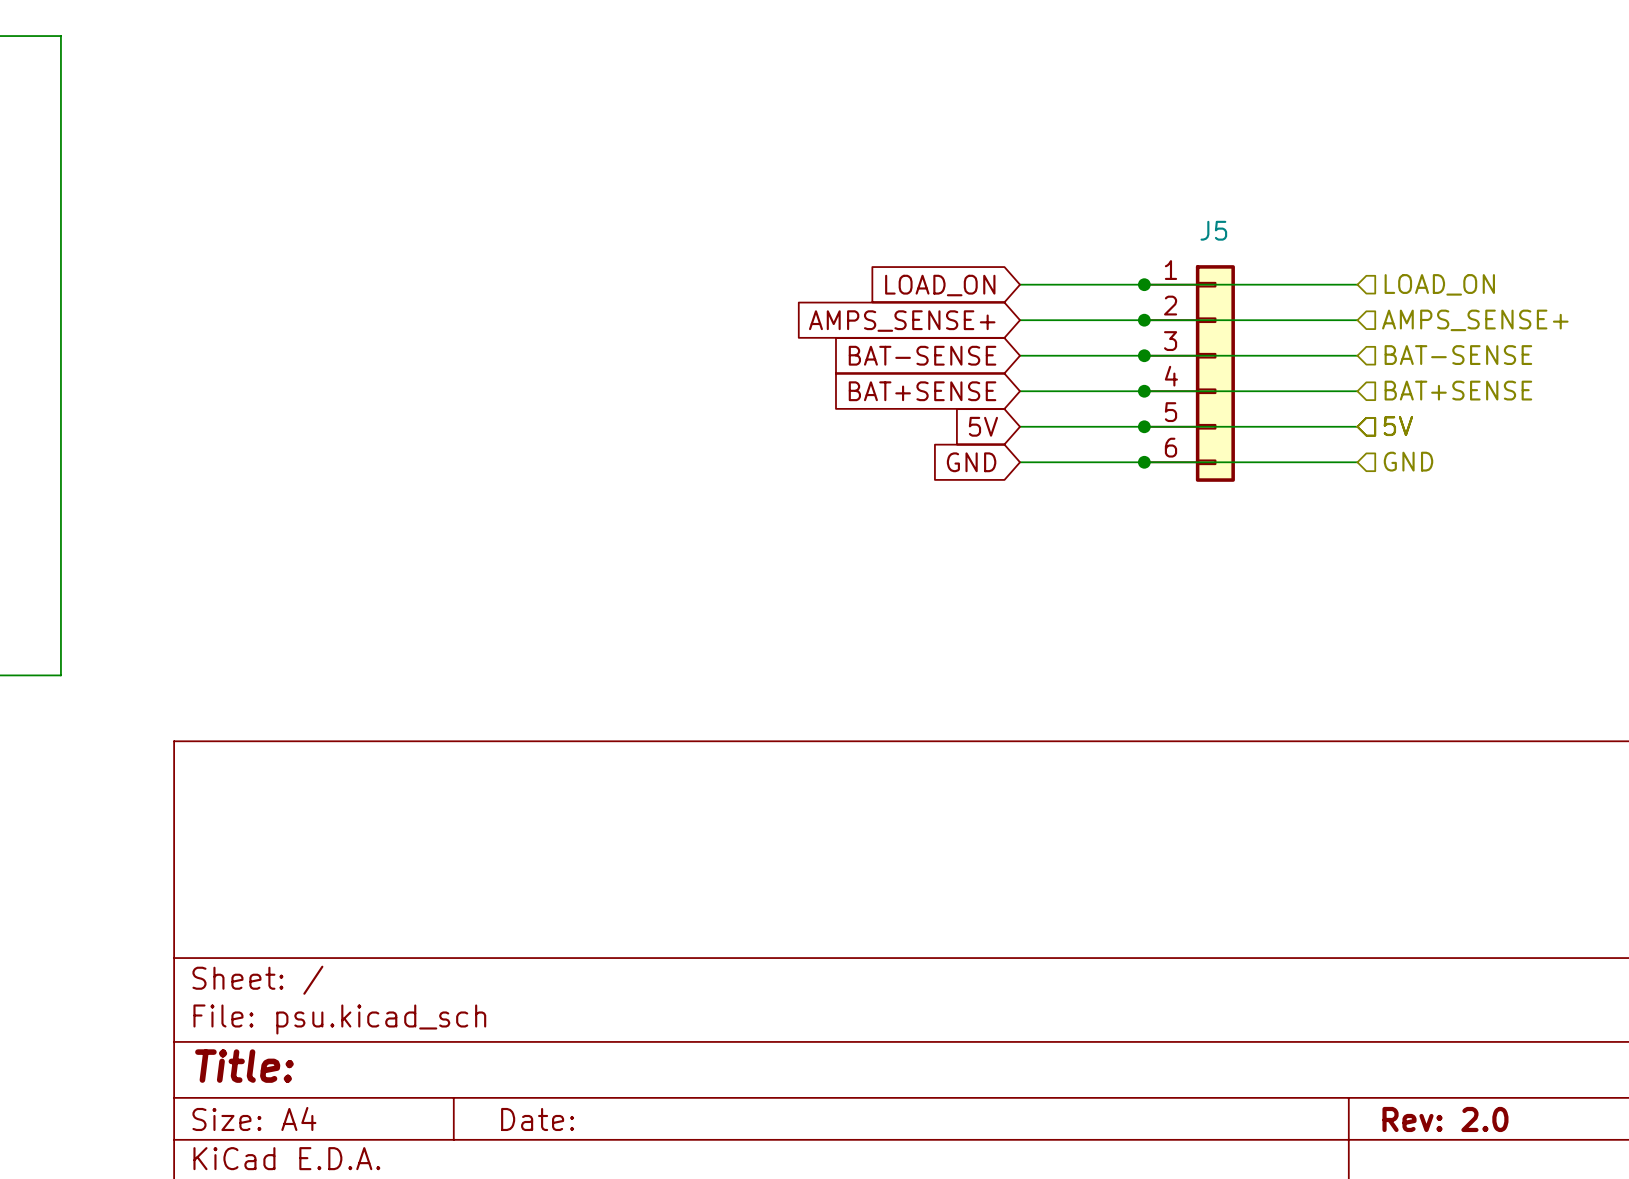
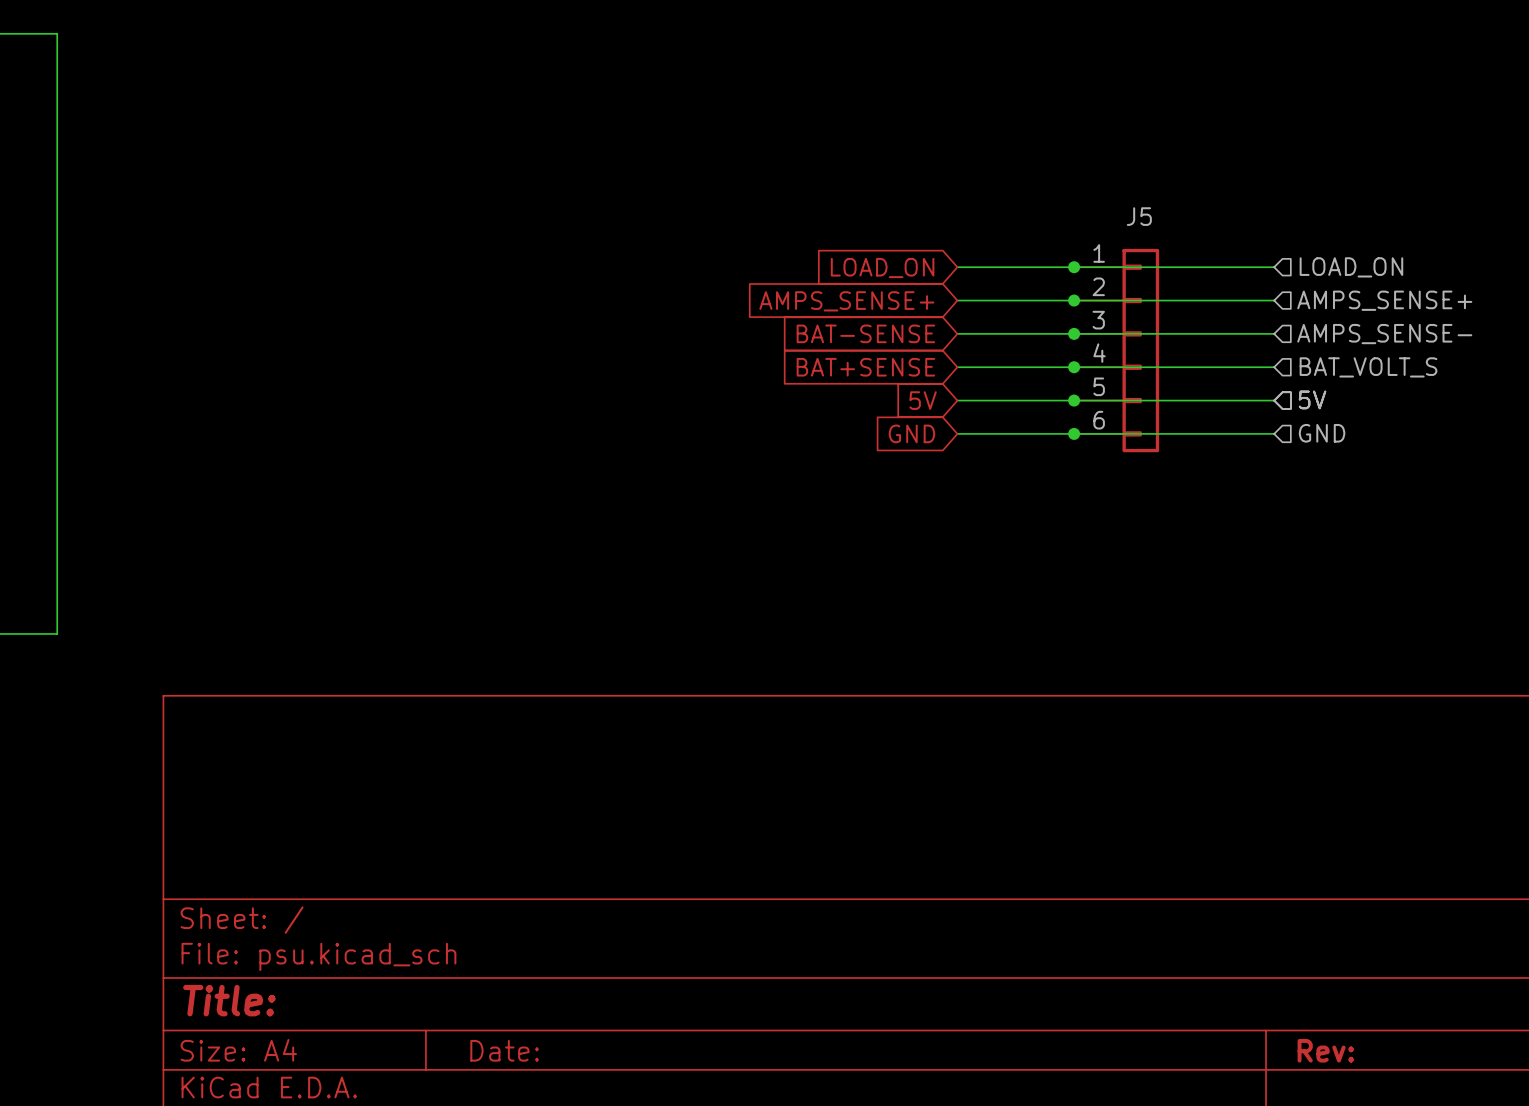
hierarchical label: BAT-SENSE (1458, 355) -> AMPS_SENSE- (1384, 334)
hierarchical label: BAT+SENSE (1458, 390) -> BAT_VOLT_S (1368, 367)
title block: Rev: 2.0 (1445, 1119) -> Rev: (1325, 1050)

